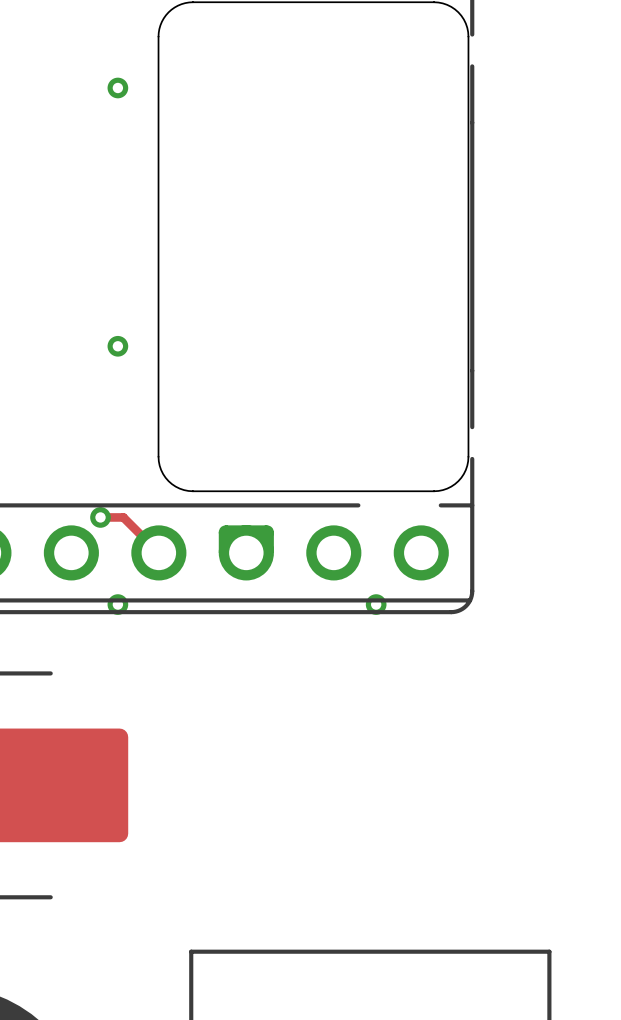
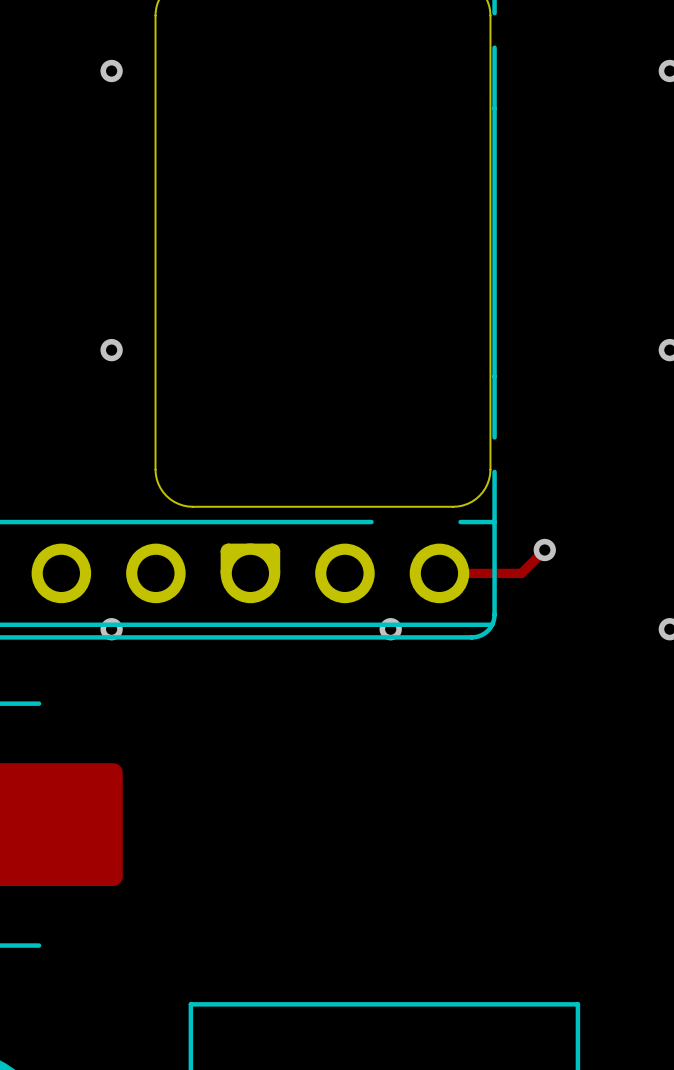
track: (100, 517) (123, 517) (158, 552) -> none
via: (100, 517) -> none
track: none -> (544, 550) (521, 573) (439, 573)
via: none -> (544, 550)

